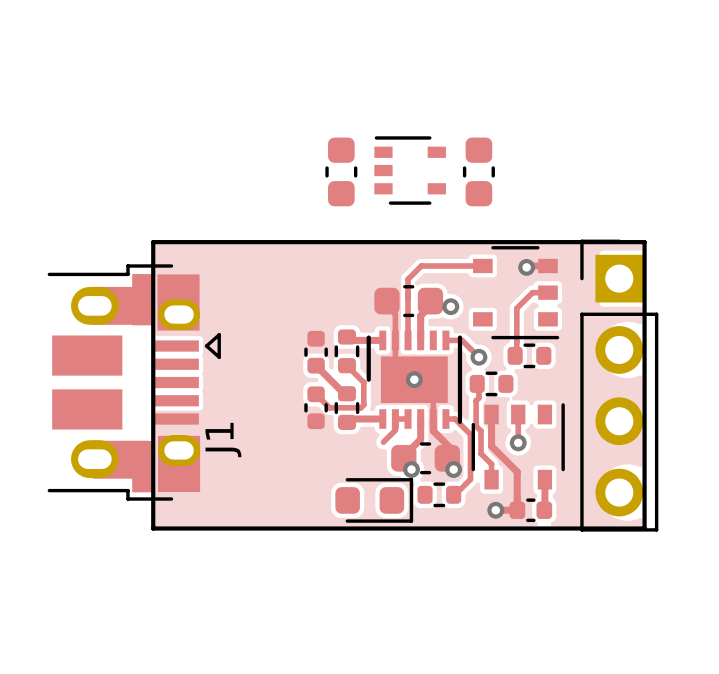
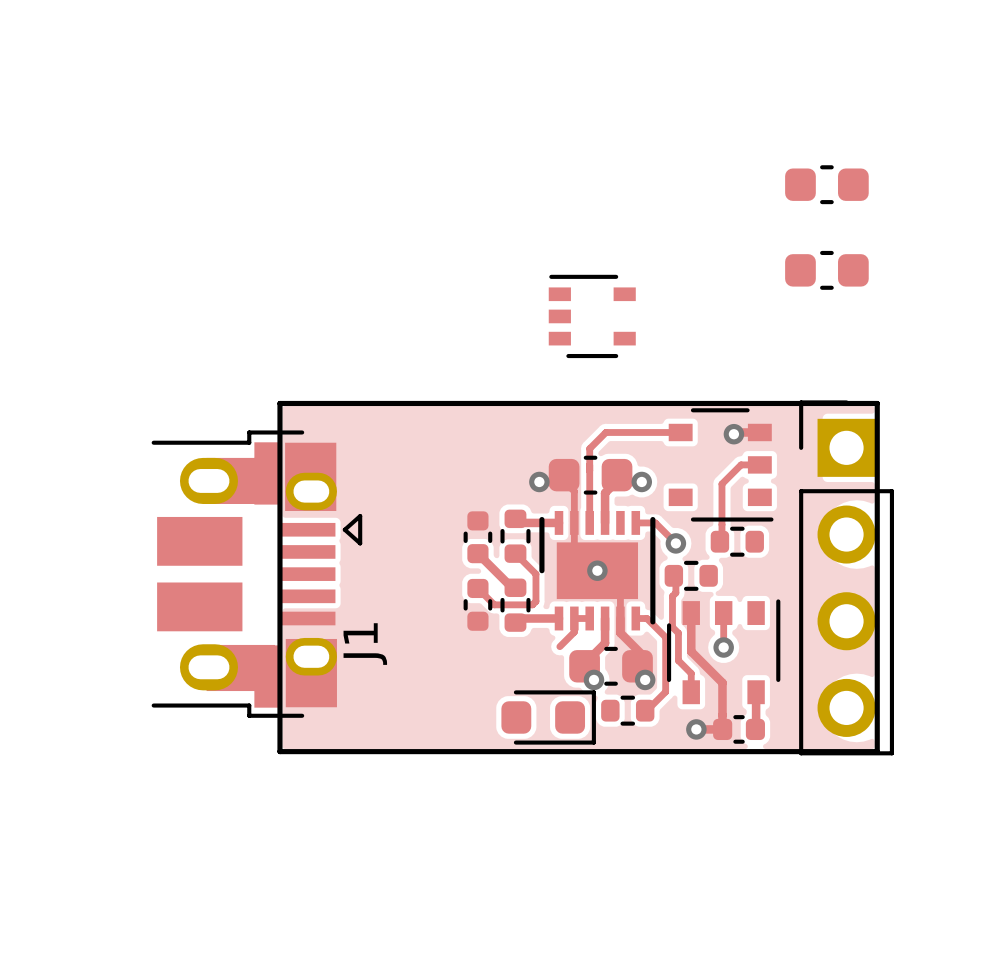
part: none -> (826, 184)
part: none -> (826, 270)
part: (341, 171) -> none
part: (478, 171) -> none
via: none -> (539, 481)

